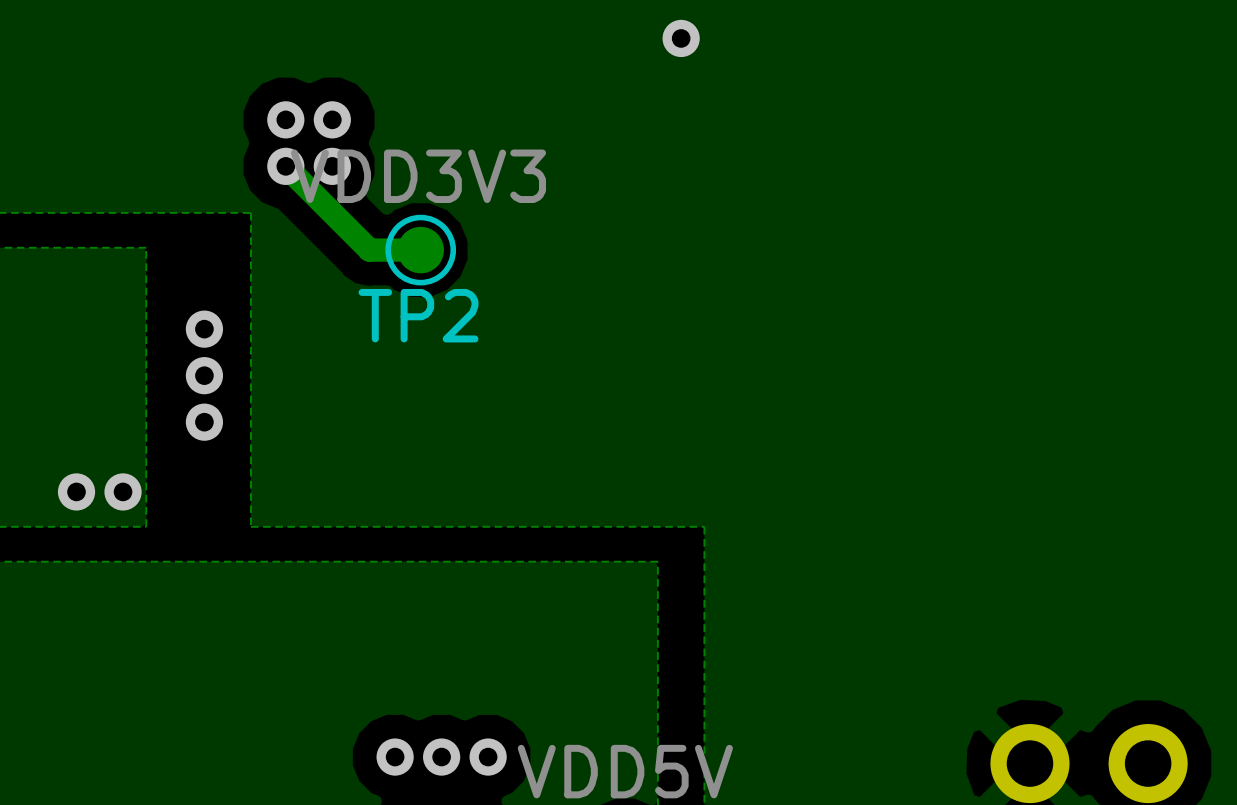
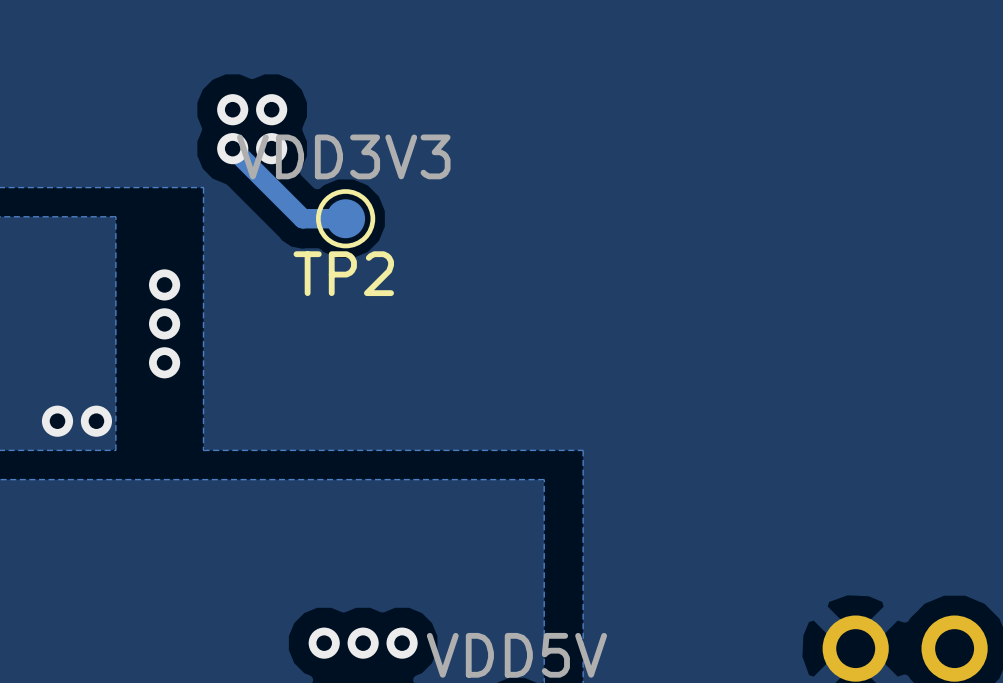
via: (681, 38) -> none

